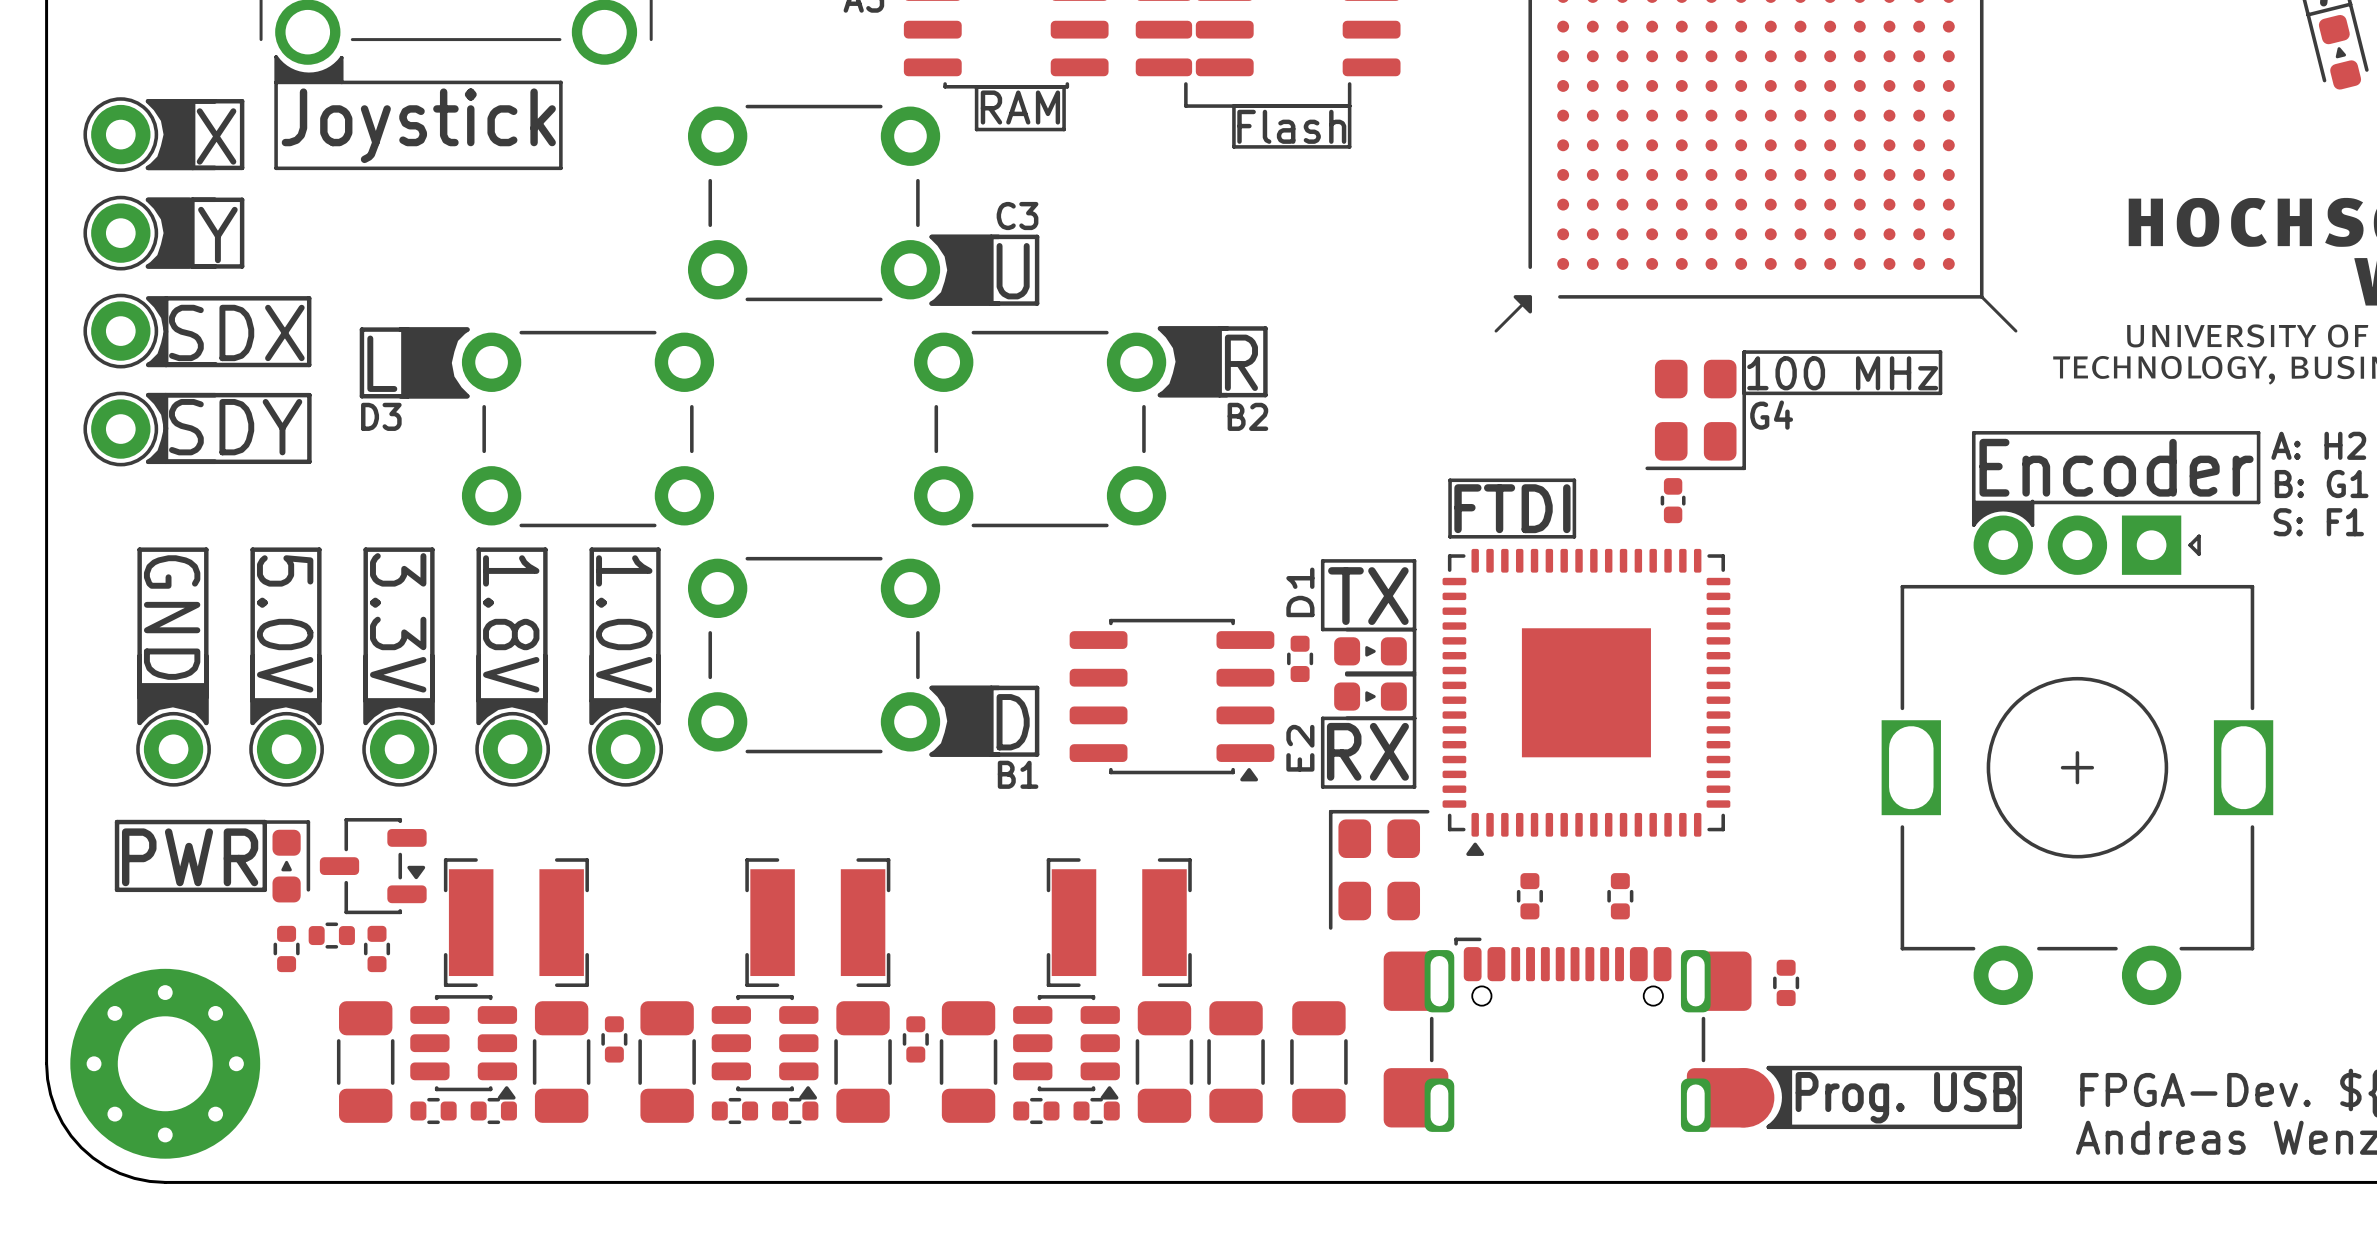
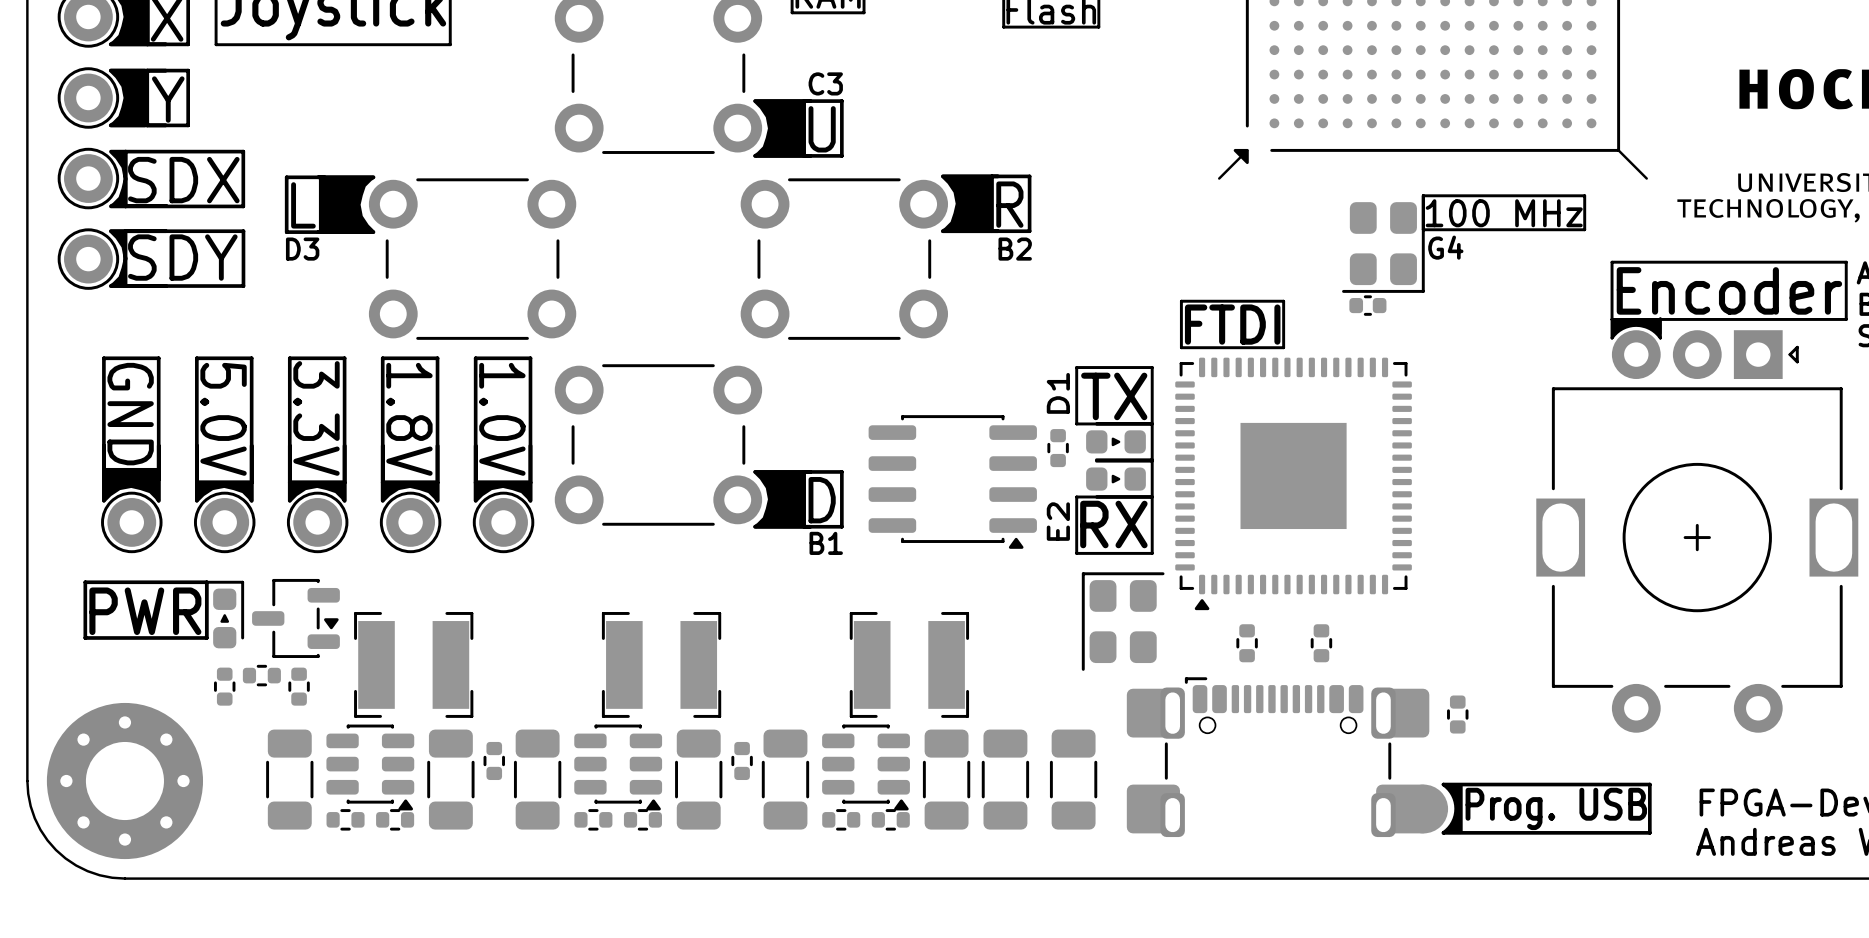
part rotation: 0° (1673, 500) -> 90° clockwise (1367, 305)

